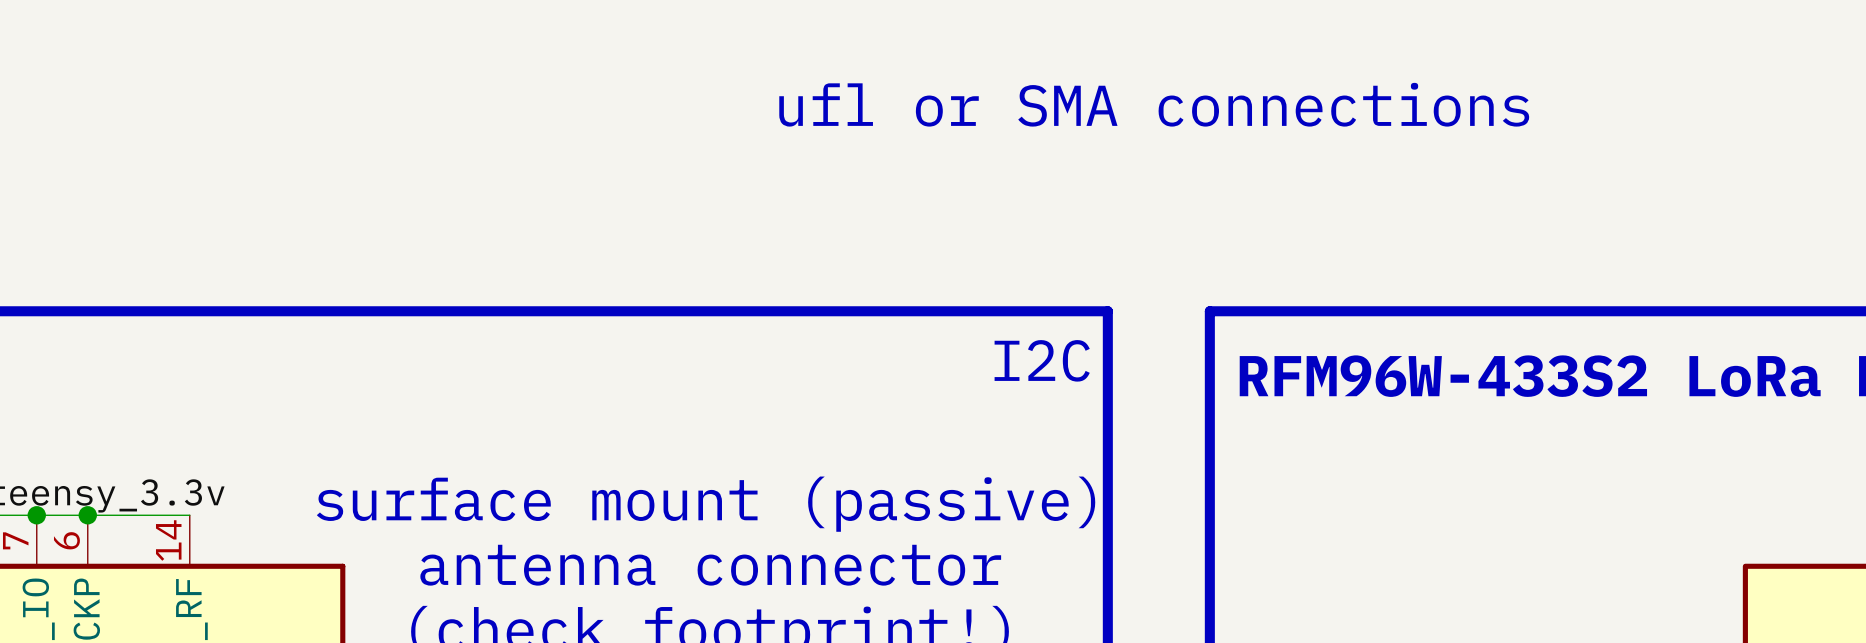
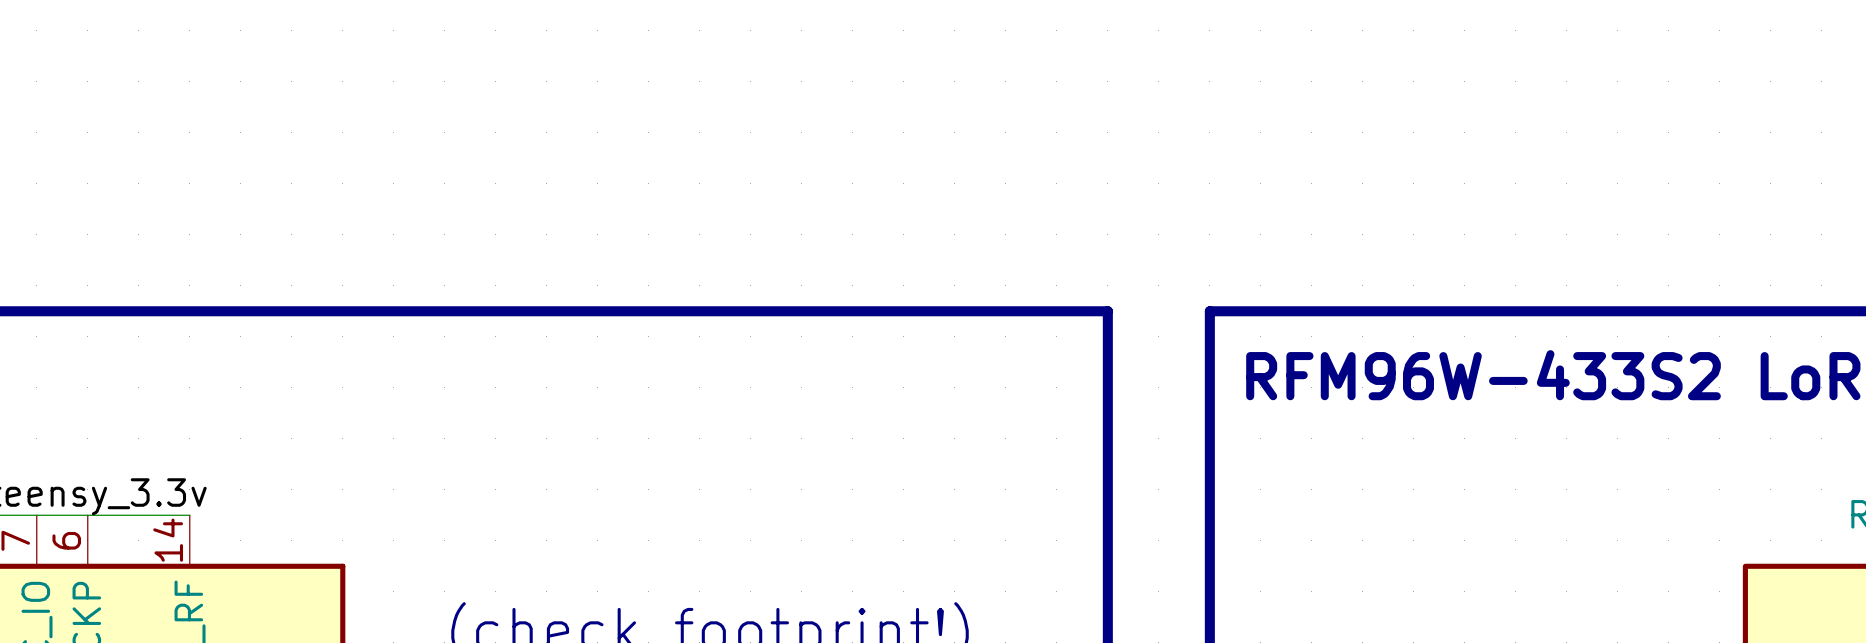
text: ufl or SMA connections (1154, 104) -> none
text: I2C (1042, 360) -> none
text: surface mount (passive) (706, 504) -> none
junction: (36, 515) -> none
junction: (87, 515) -> none
text: antenna connector (710, 565) -> none

